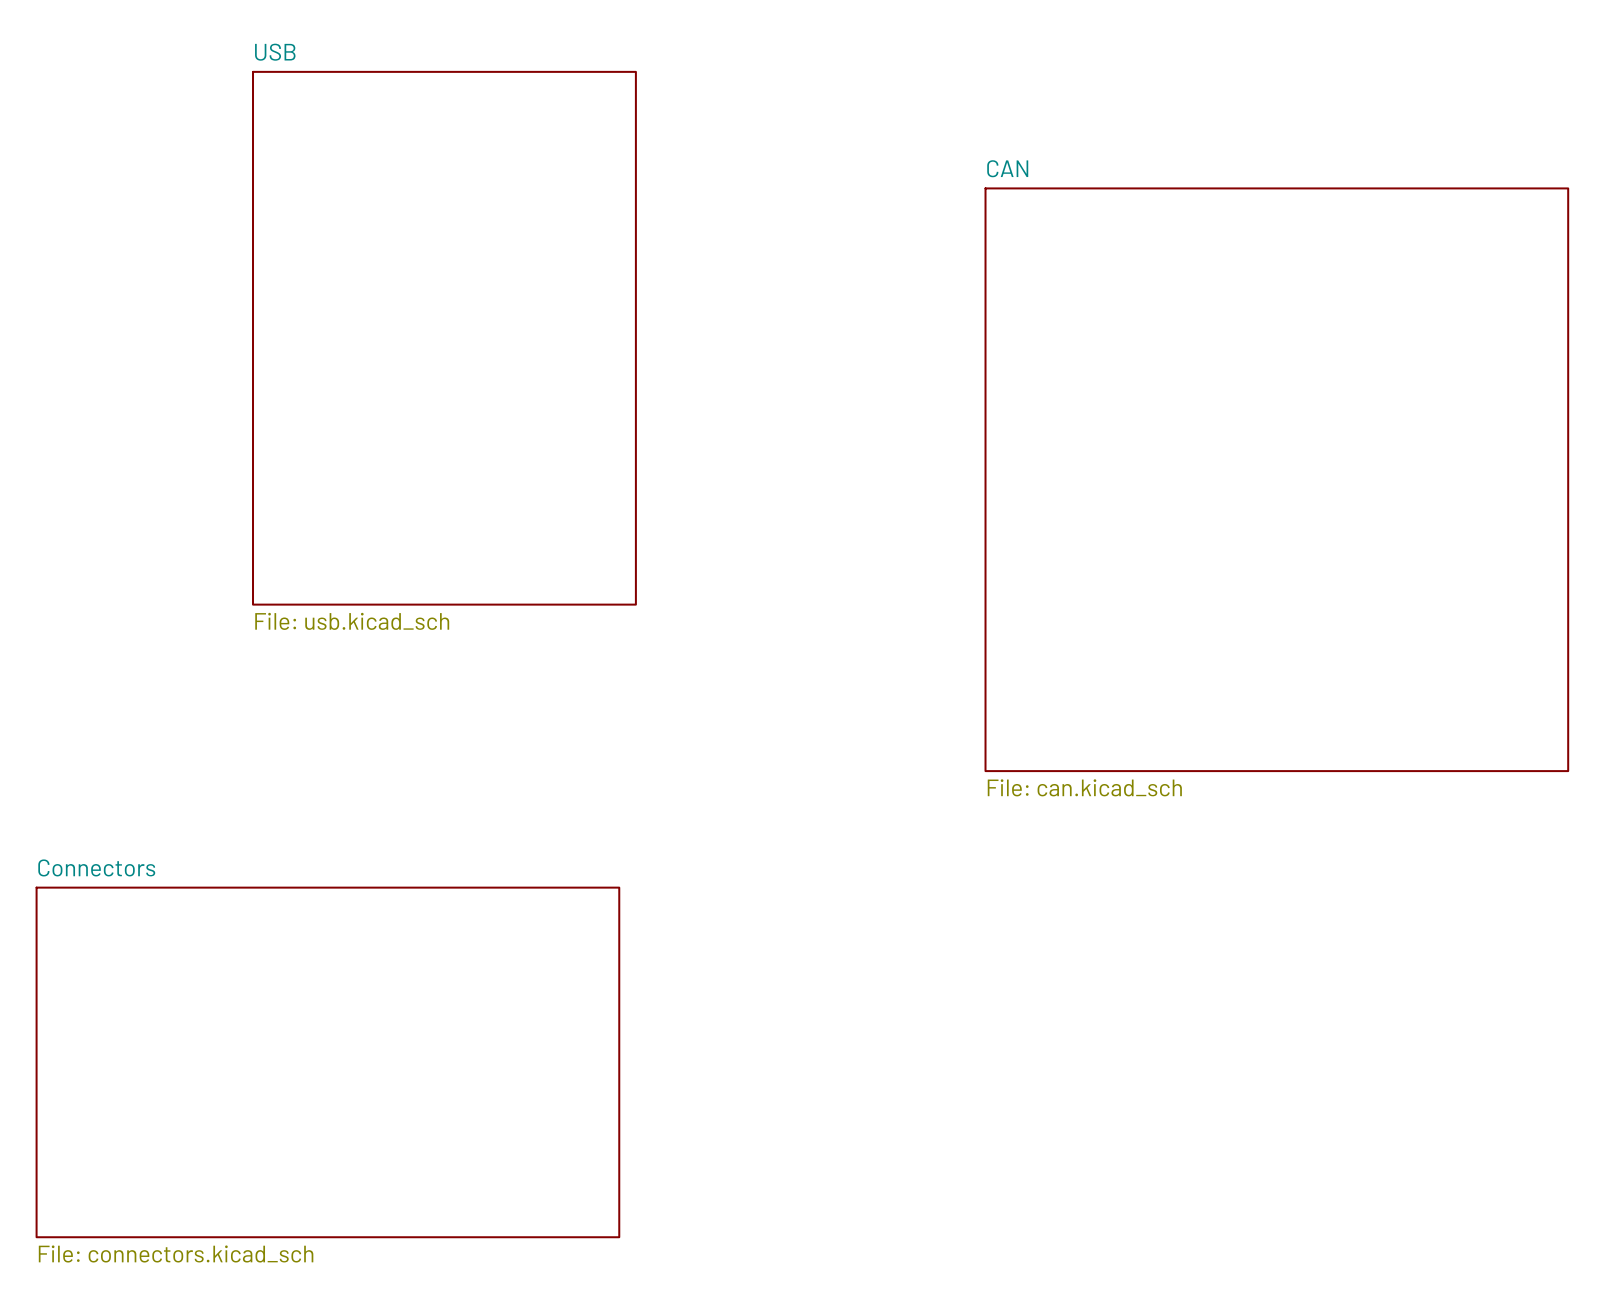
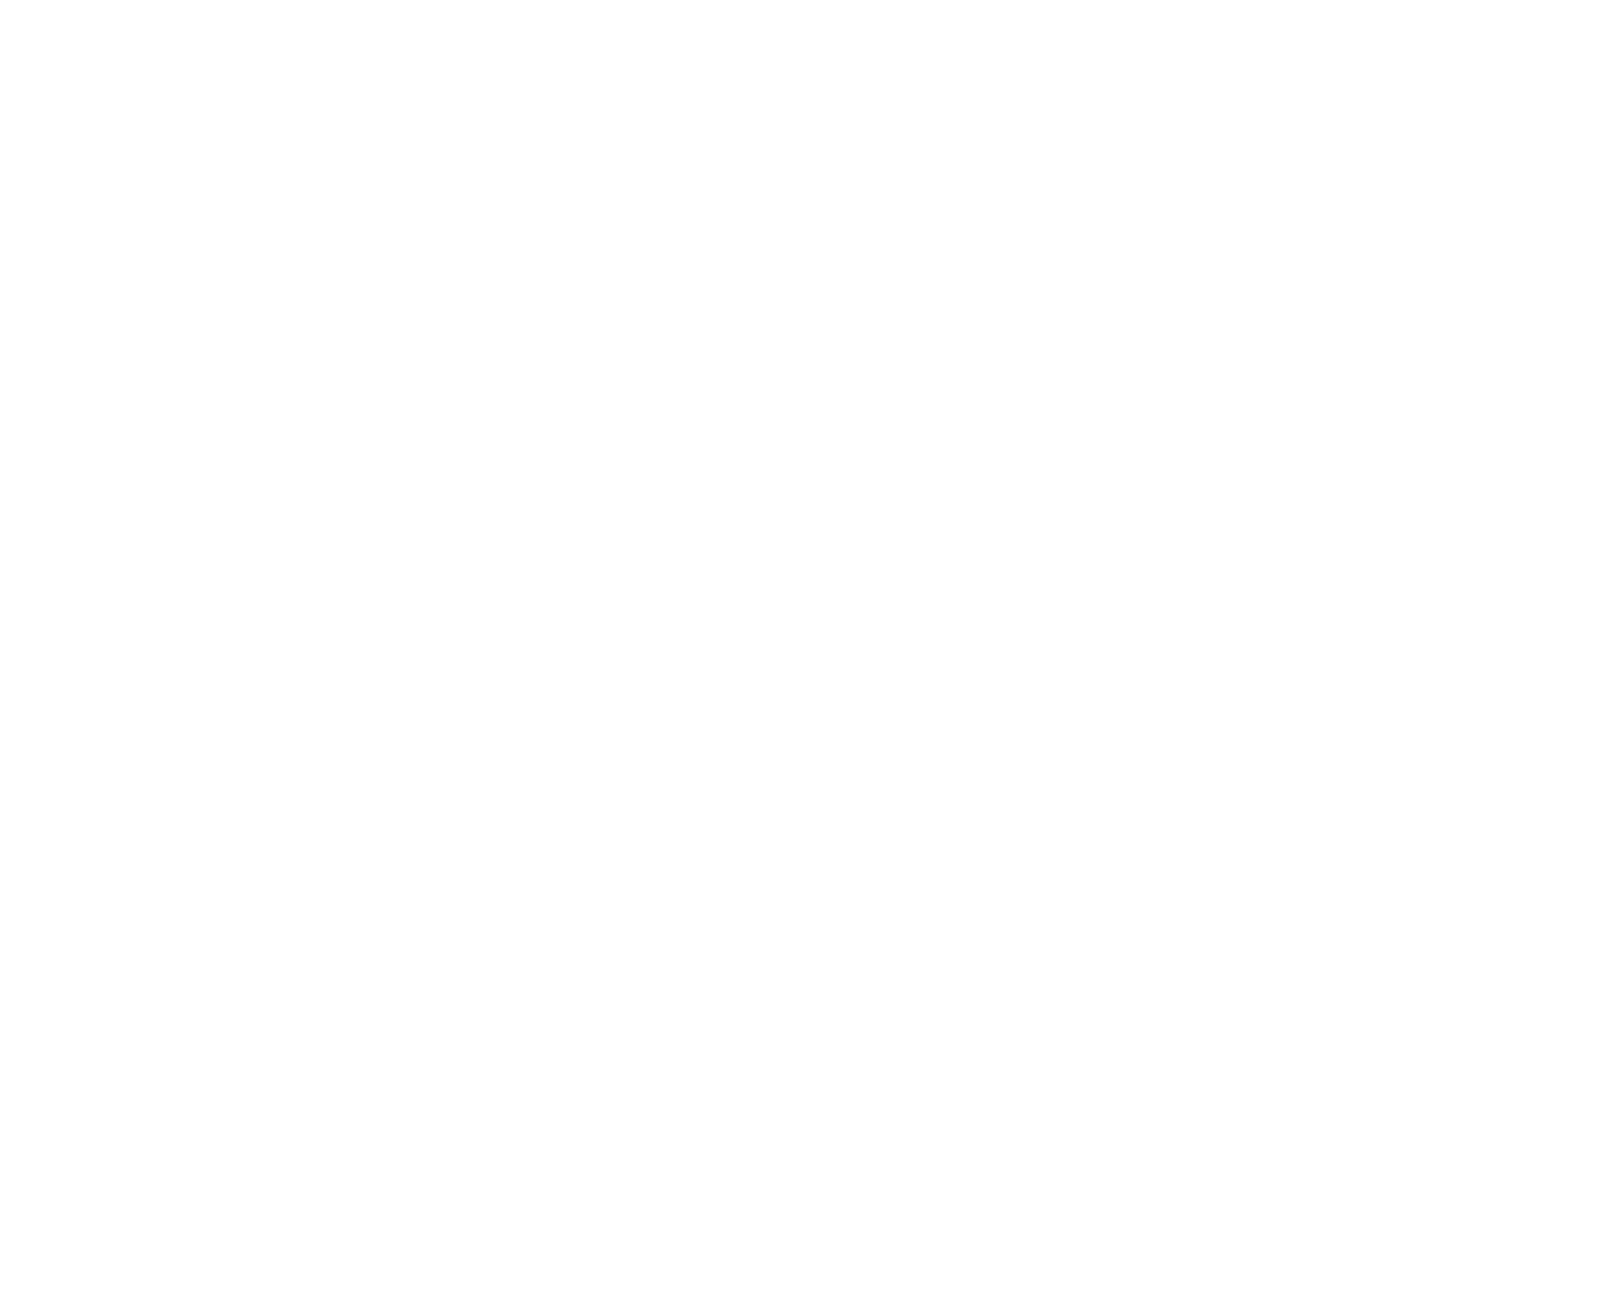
sheet USB: File: usb.kicad_sch (444, 338) -> none
sheet CAN: File: can.kicad_sch (1276, 479) -> none
sheet Connectors: File: connectors.kicad_sch (327, 1062) -> none

